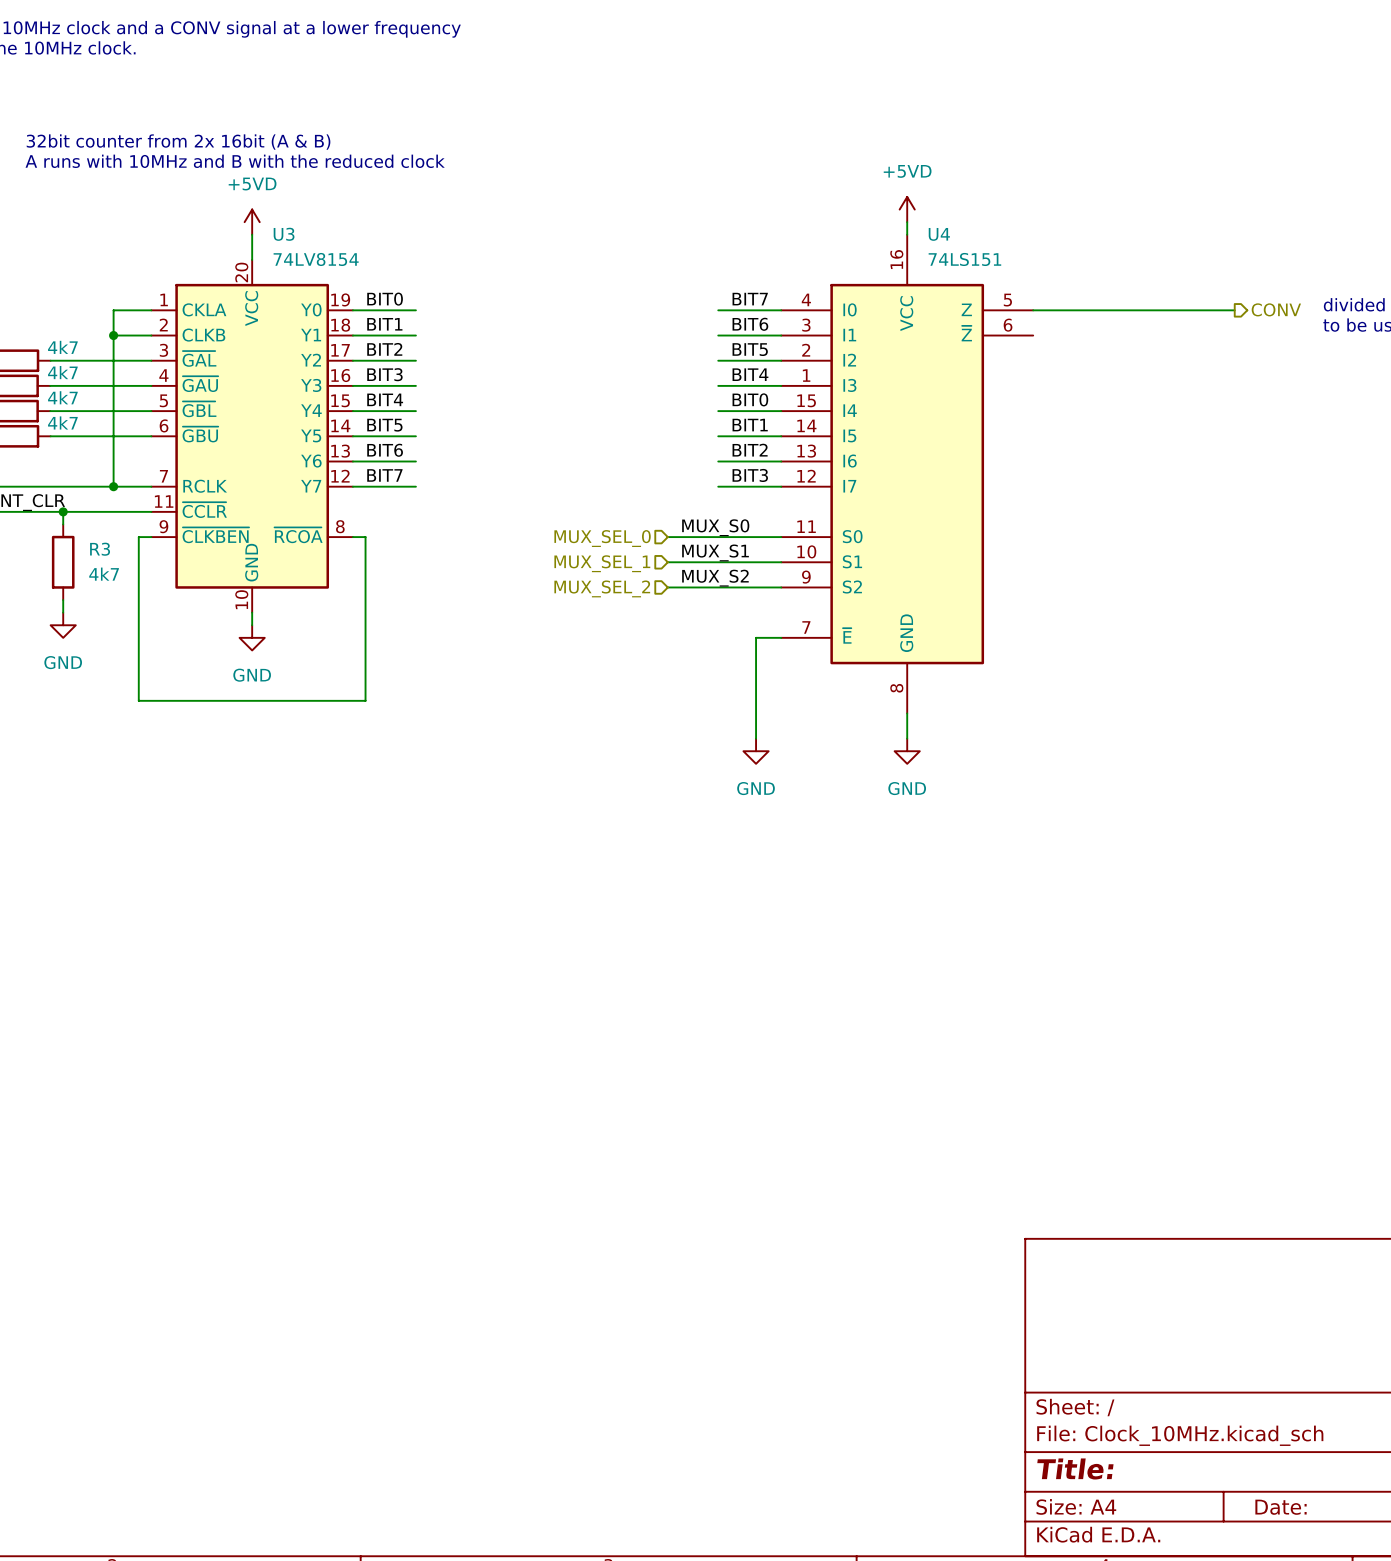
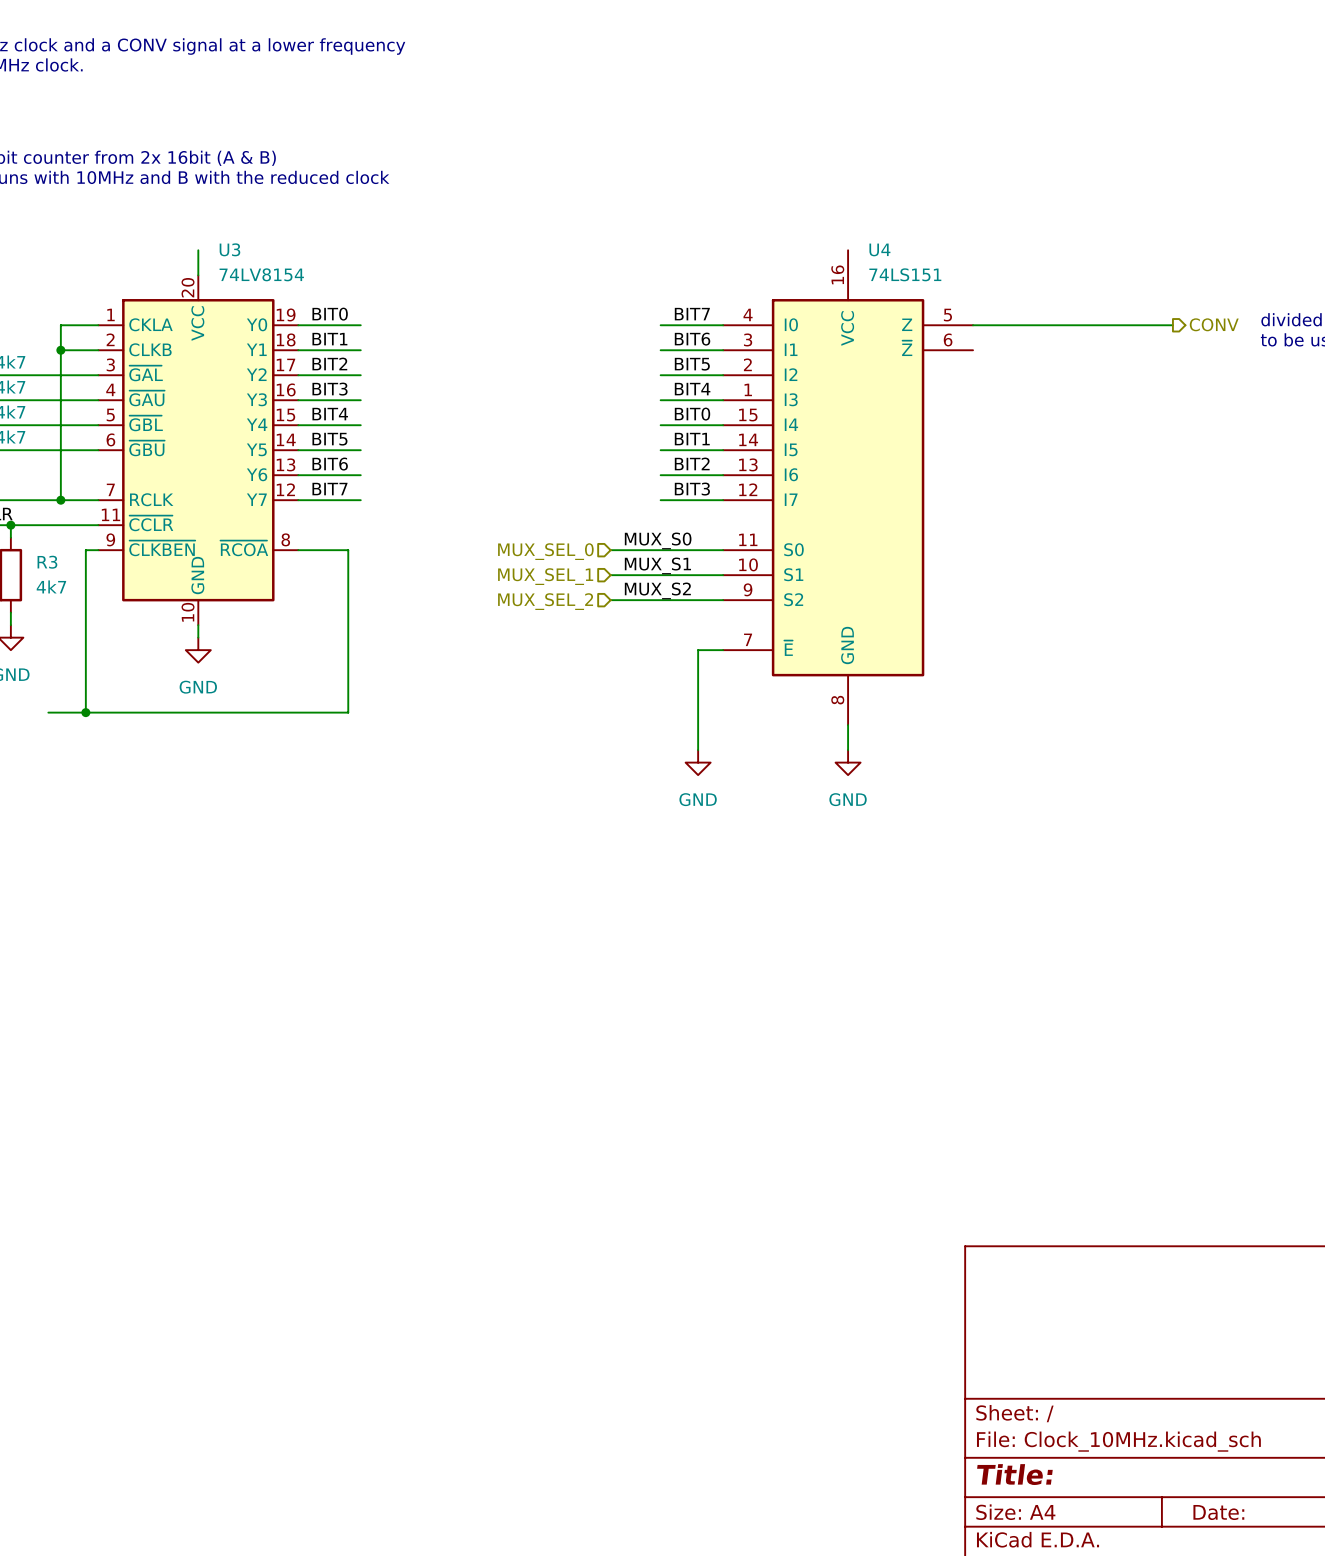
power symbol: +5VD (907, 209) -> none
power symbol: +5VD (252, 222) -> none
wire: (907, 222) (907, 234) -> none
wire: (365, 537) (365, 700) -> (310, 550) (348, 550) (348, 712) (310, 712)
wire: none -> (48, 712) (85, 712)
junction: none -> (85, 712)

